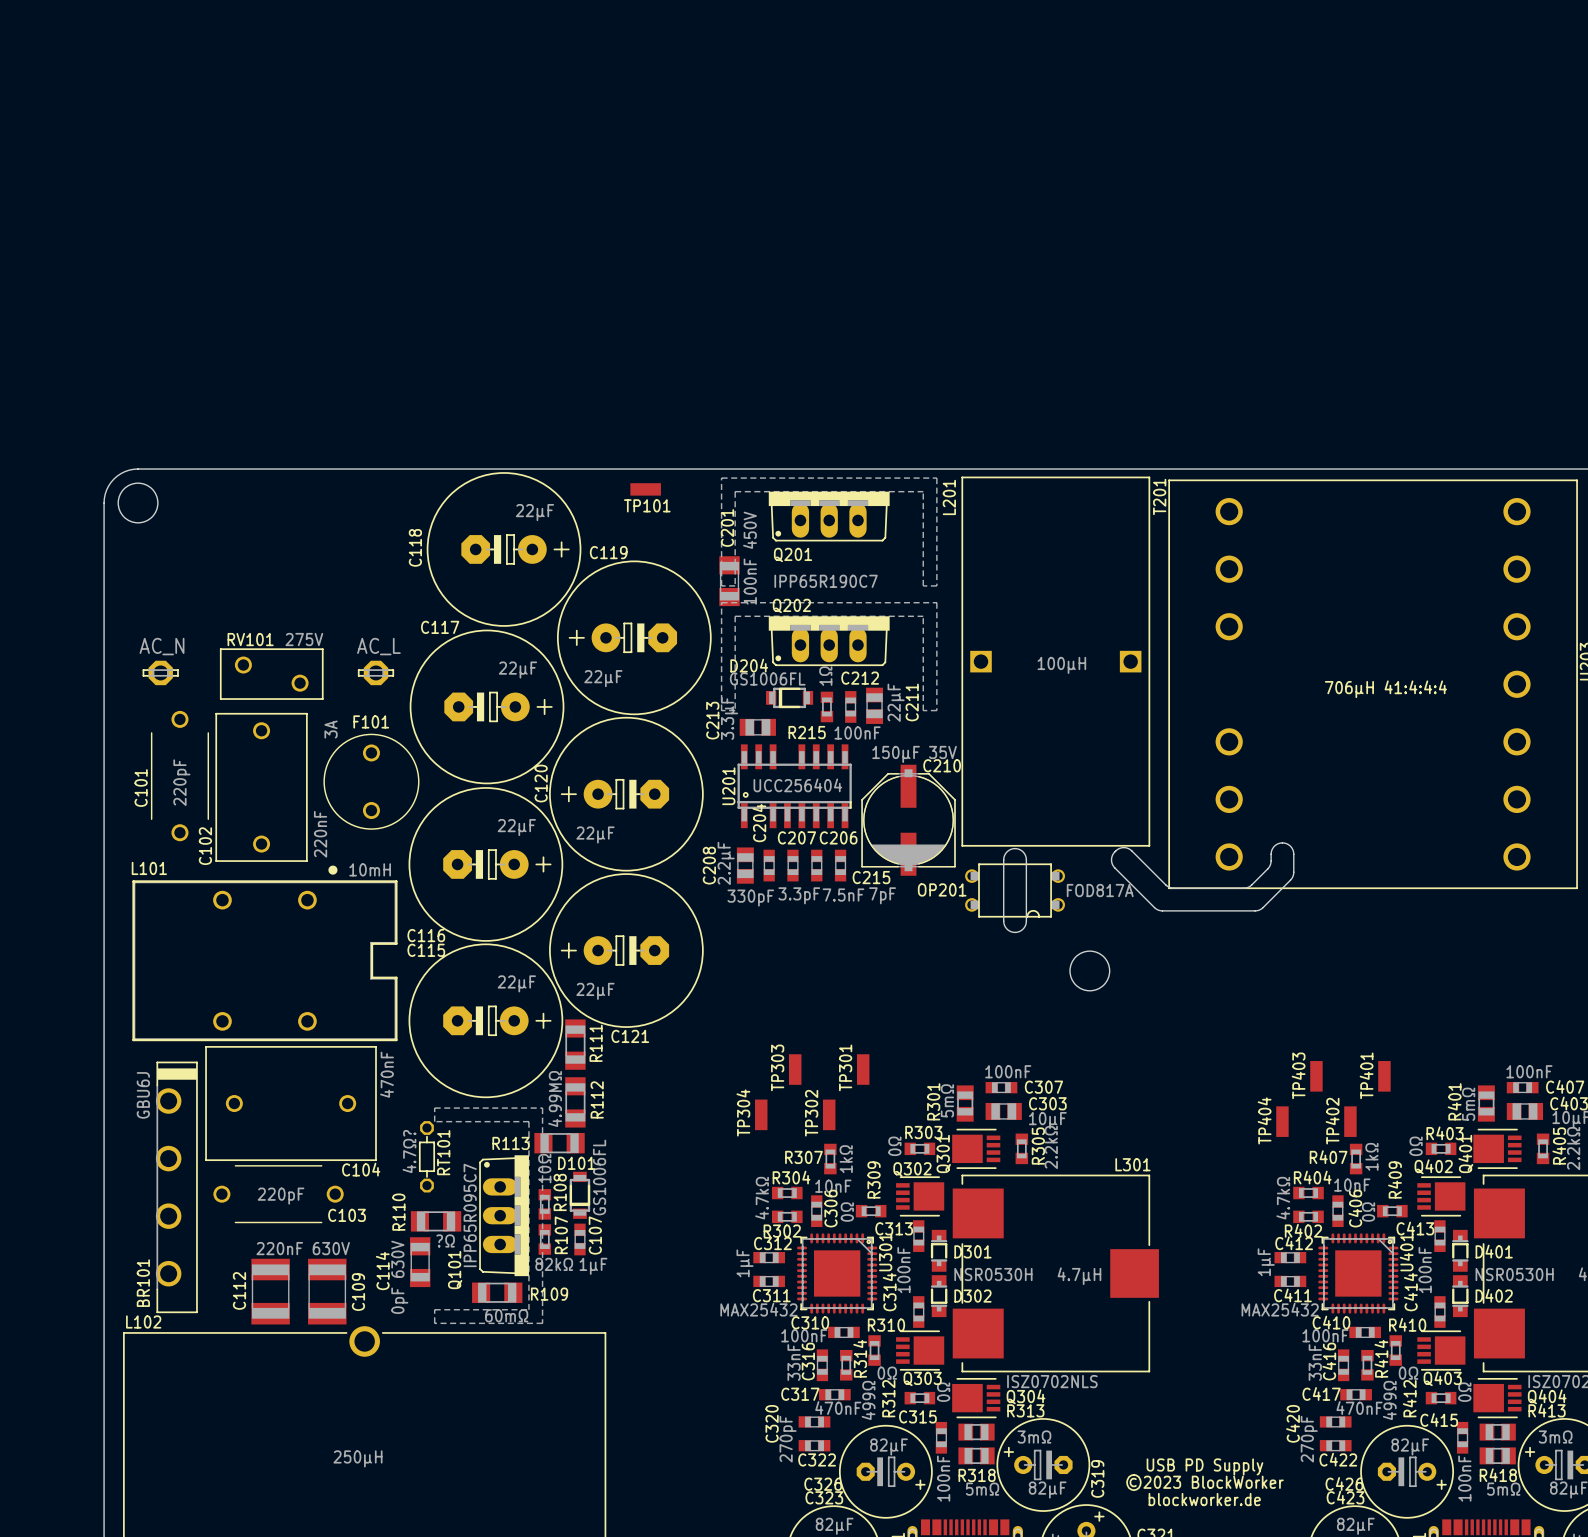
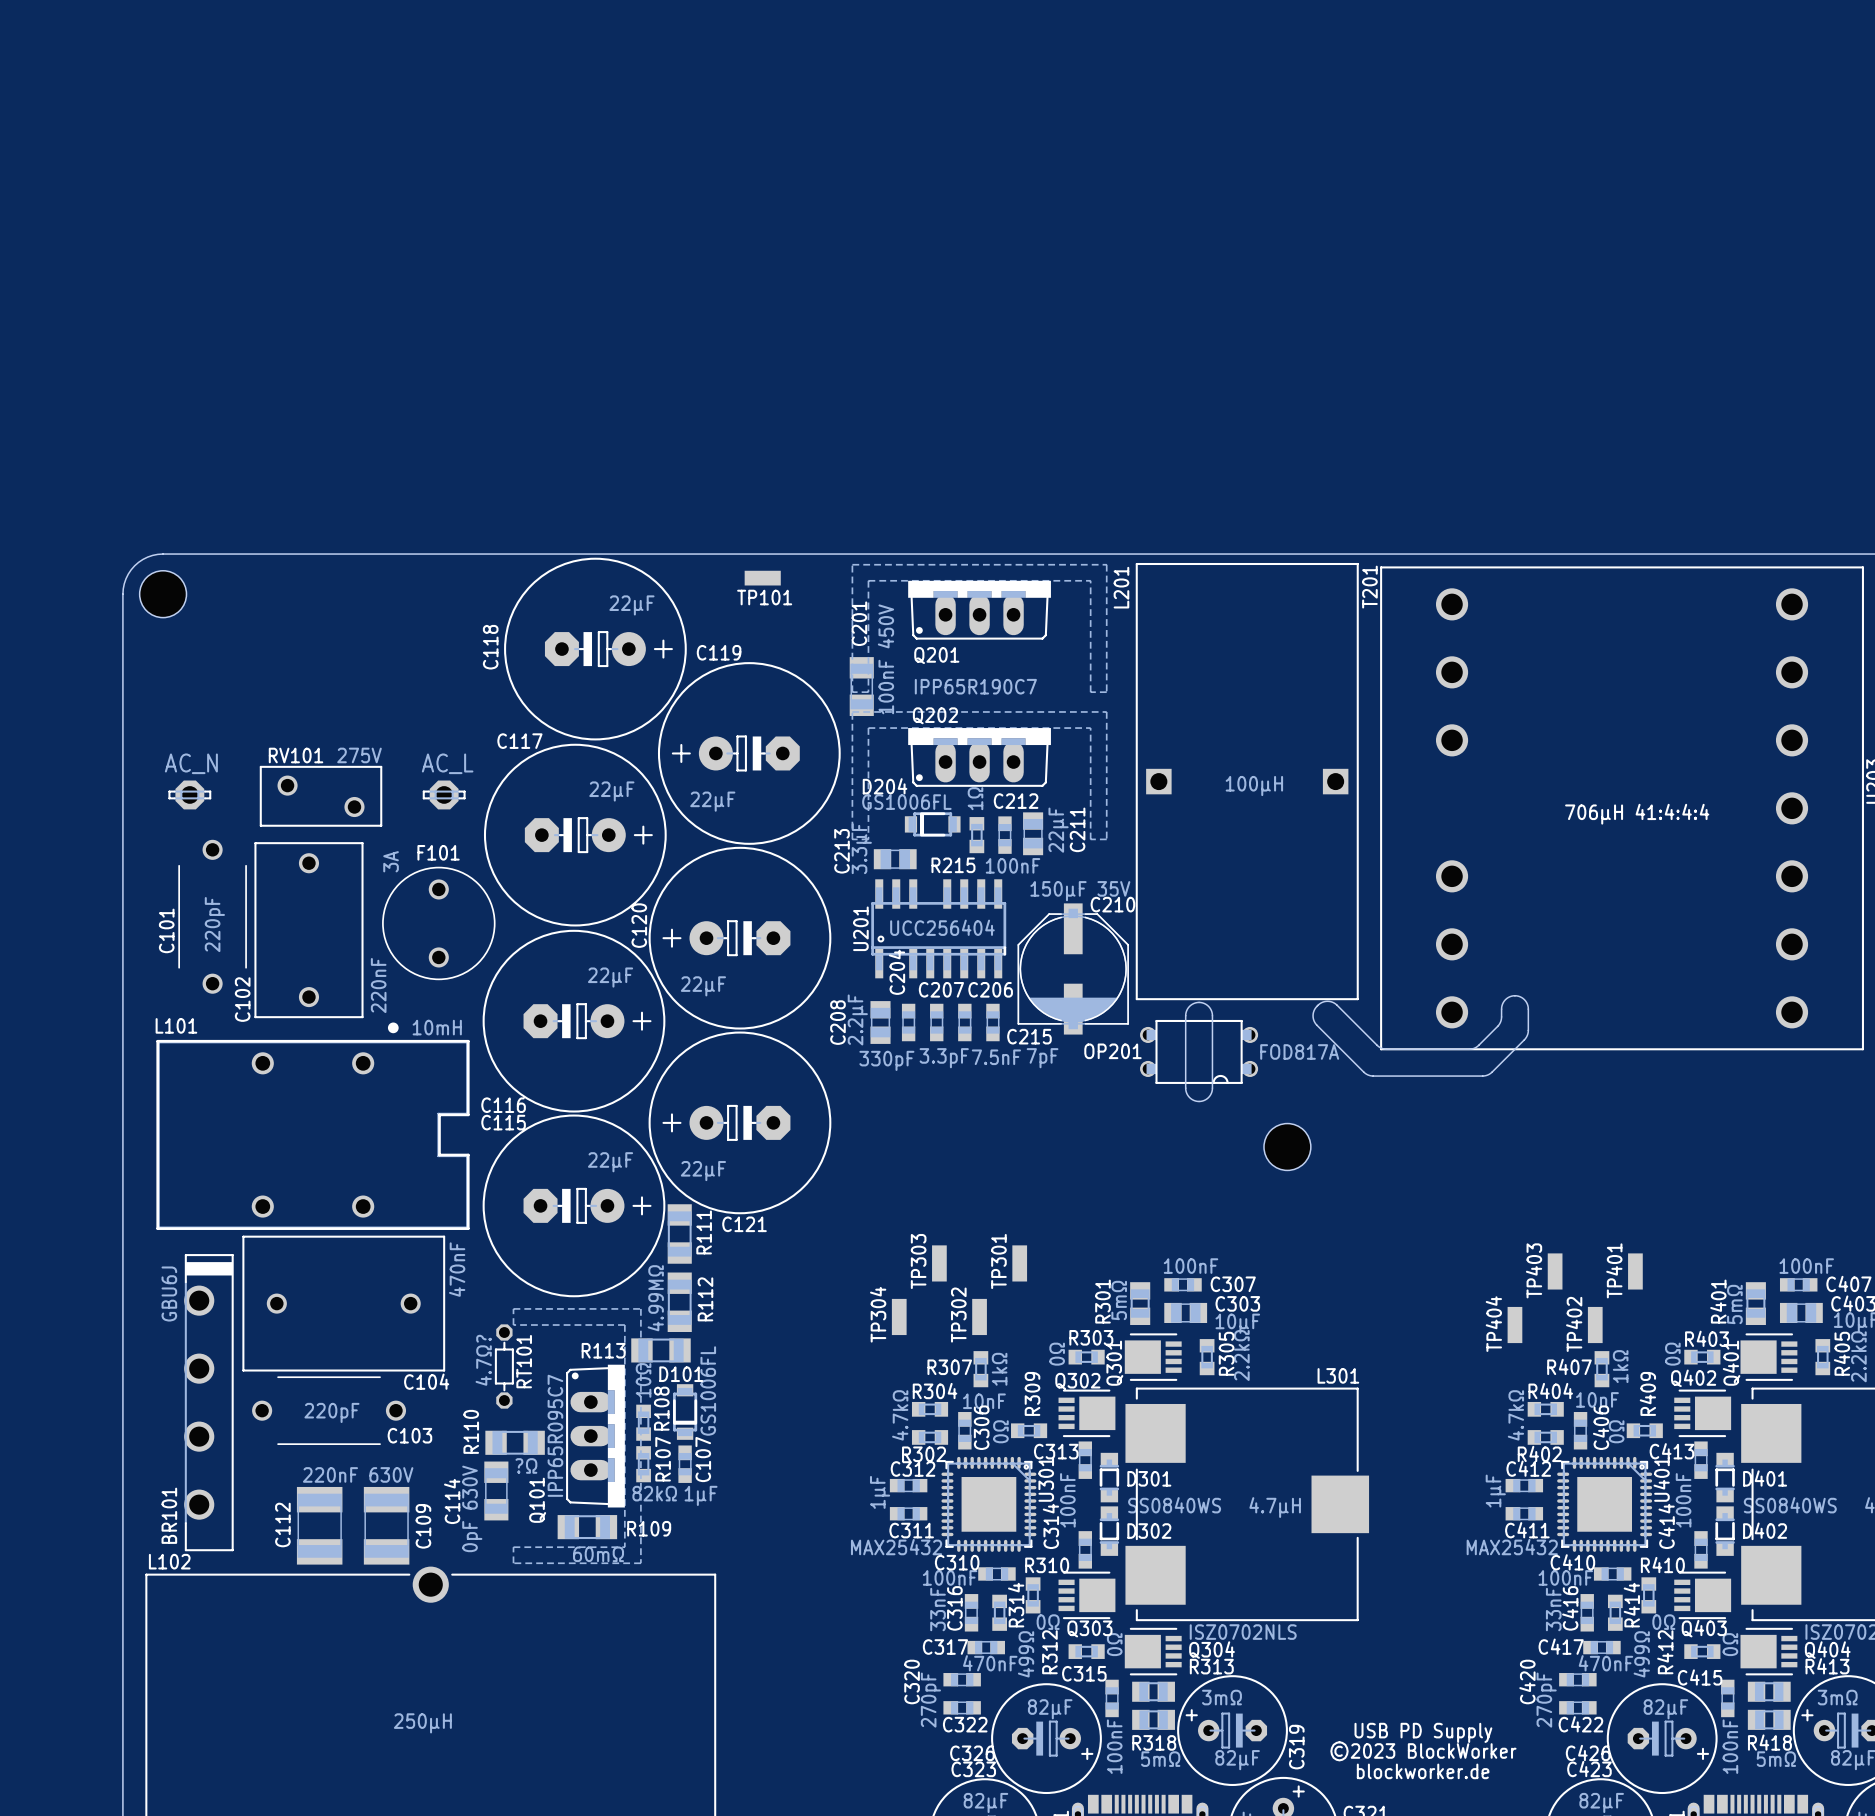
D302 value: NSR0530H (993, 1274) -> SS0840WS (1174, 1505)
D402 value: NSR0530H (1514, 1274) -> SS0840WS (1790, 1505)

